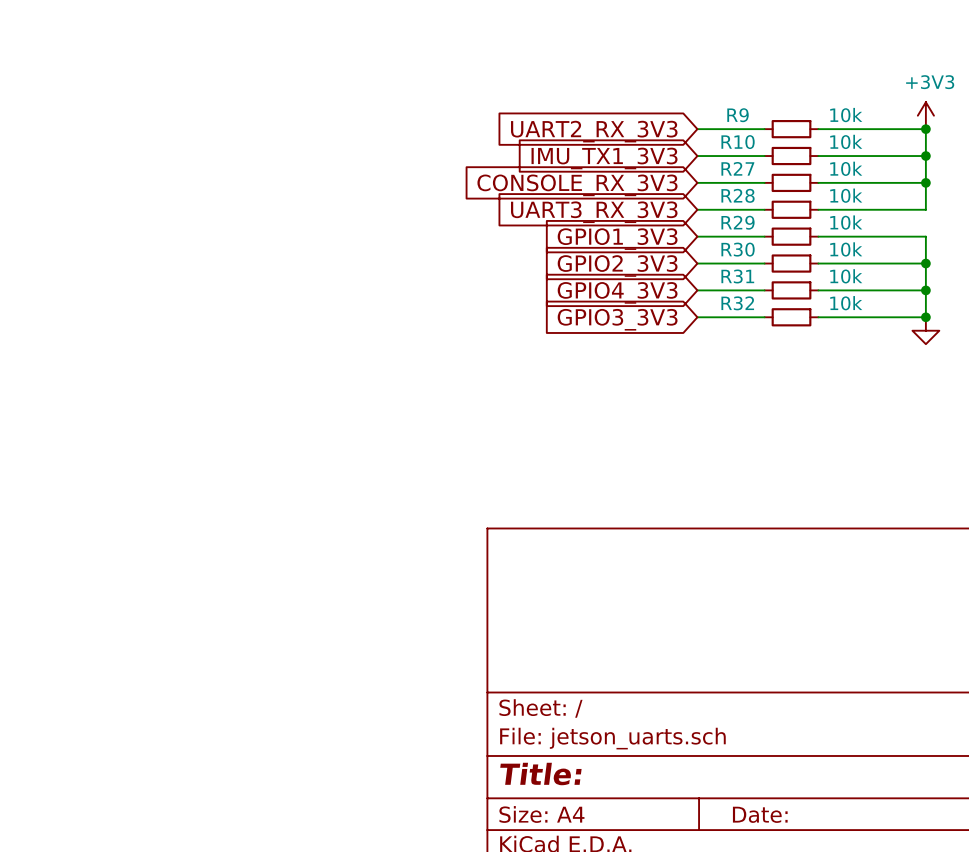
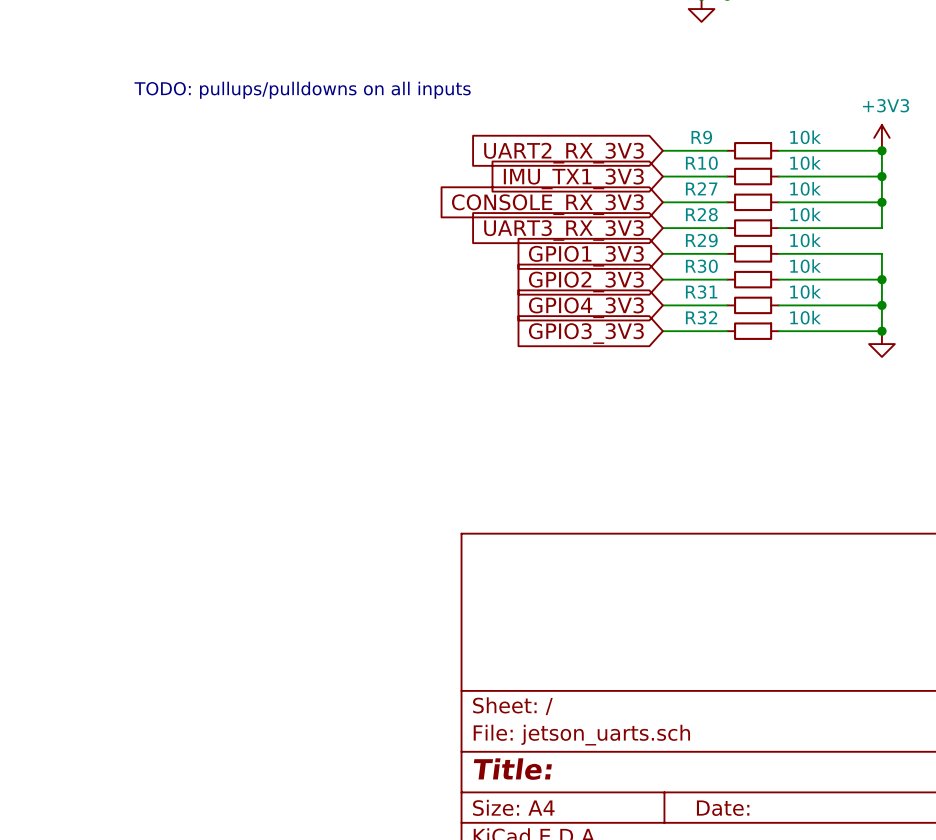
text: none -> TODO: pullups/pulldowns on all inputs (302, 90)

